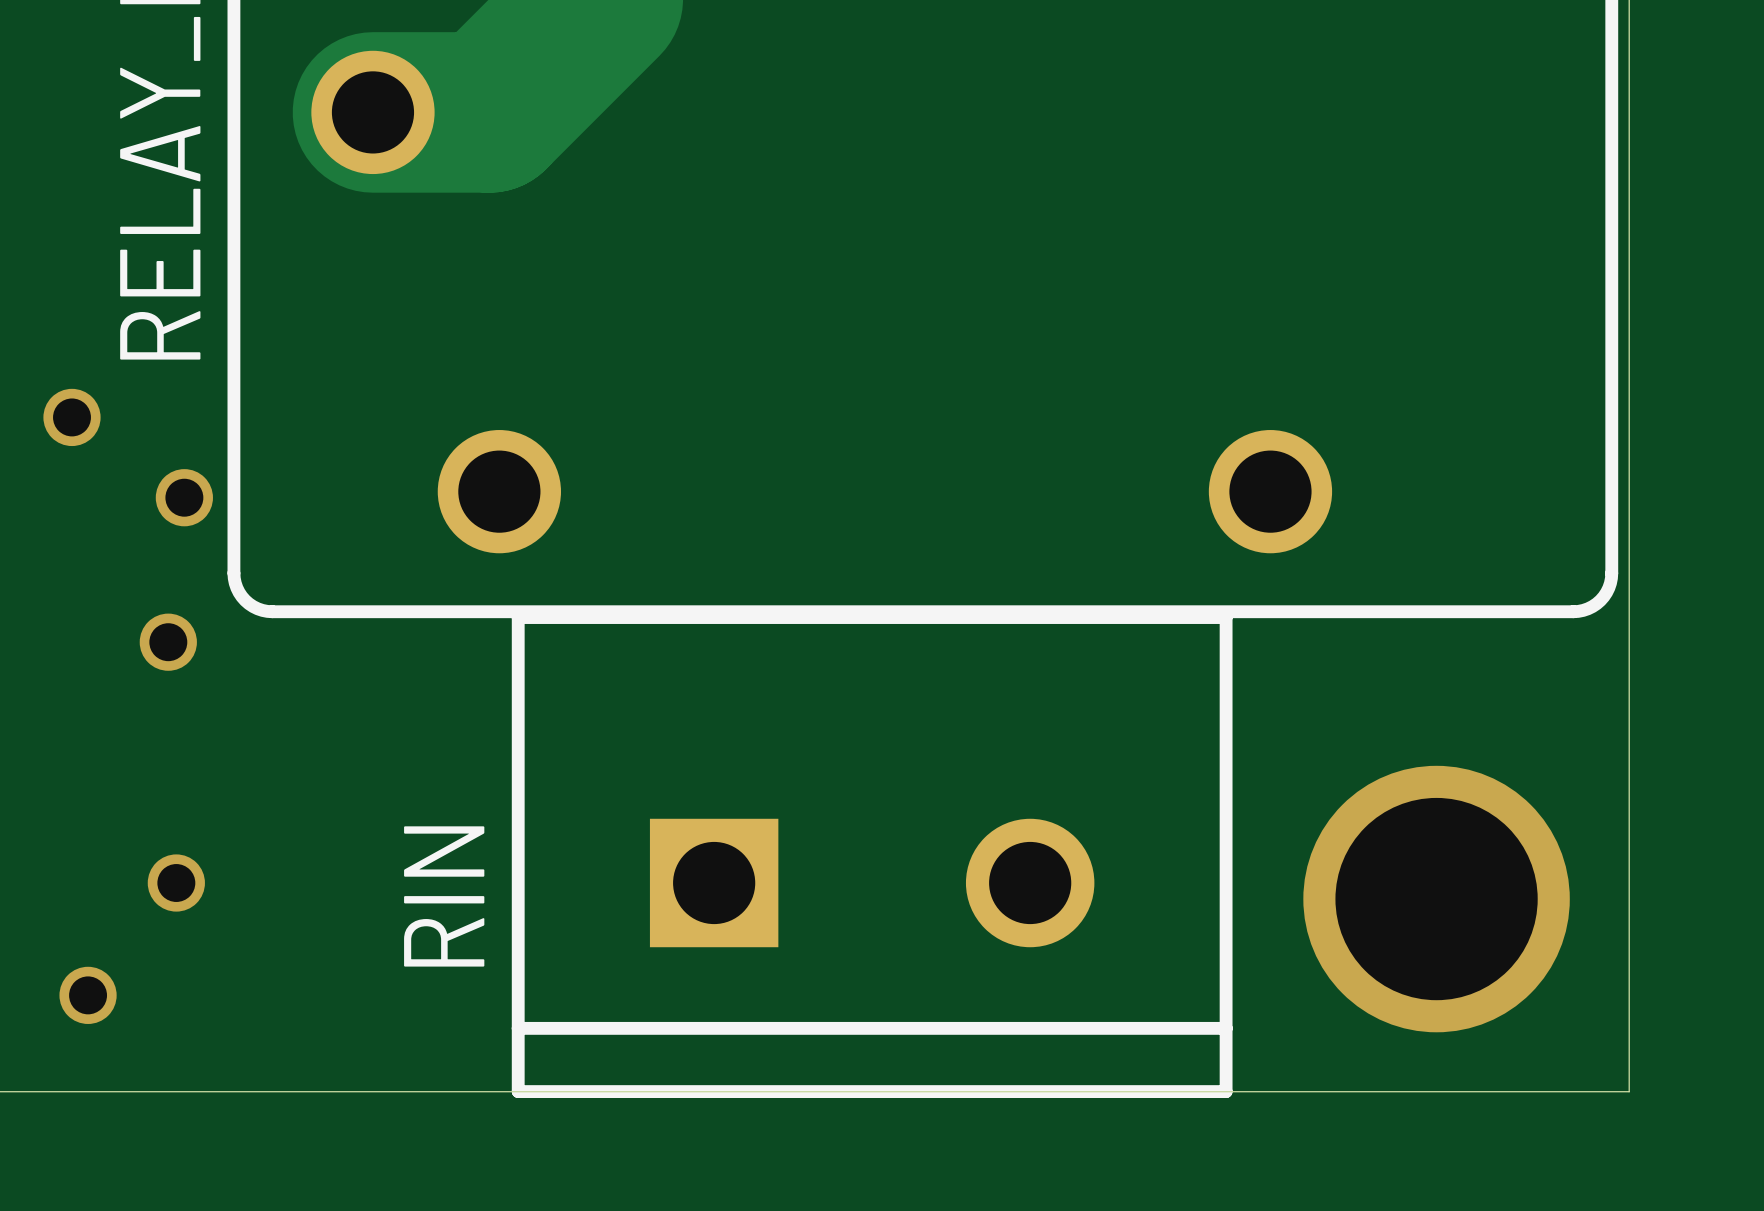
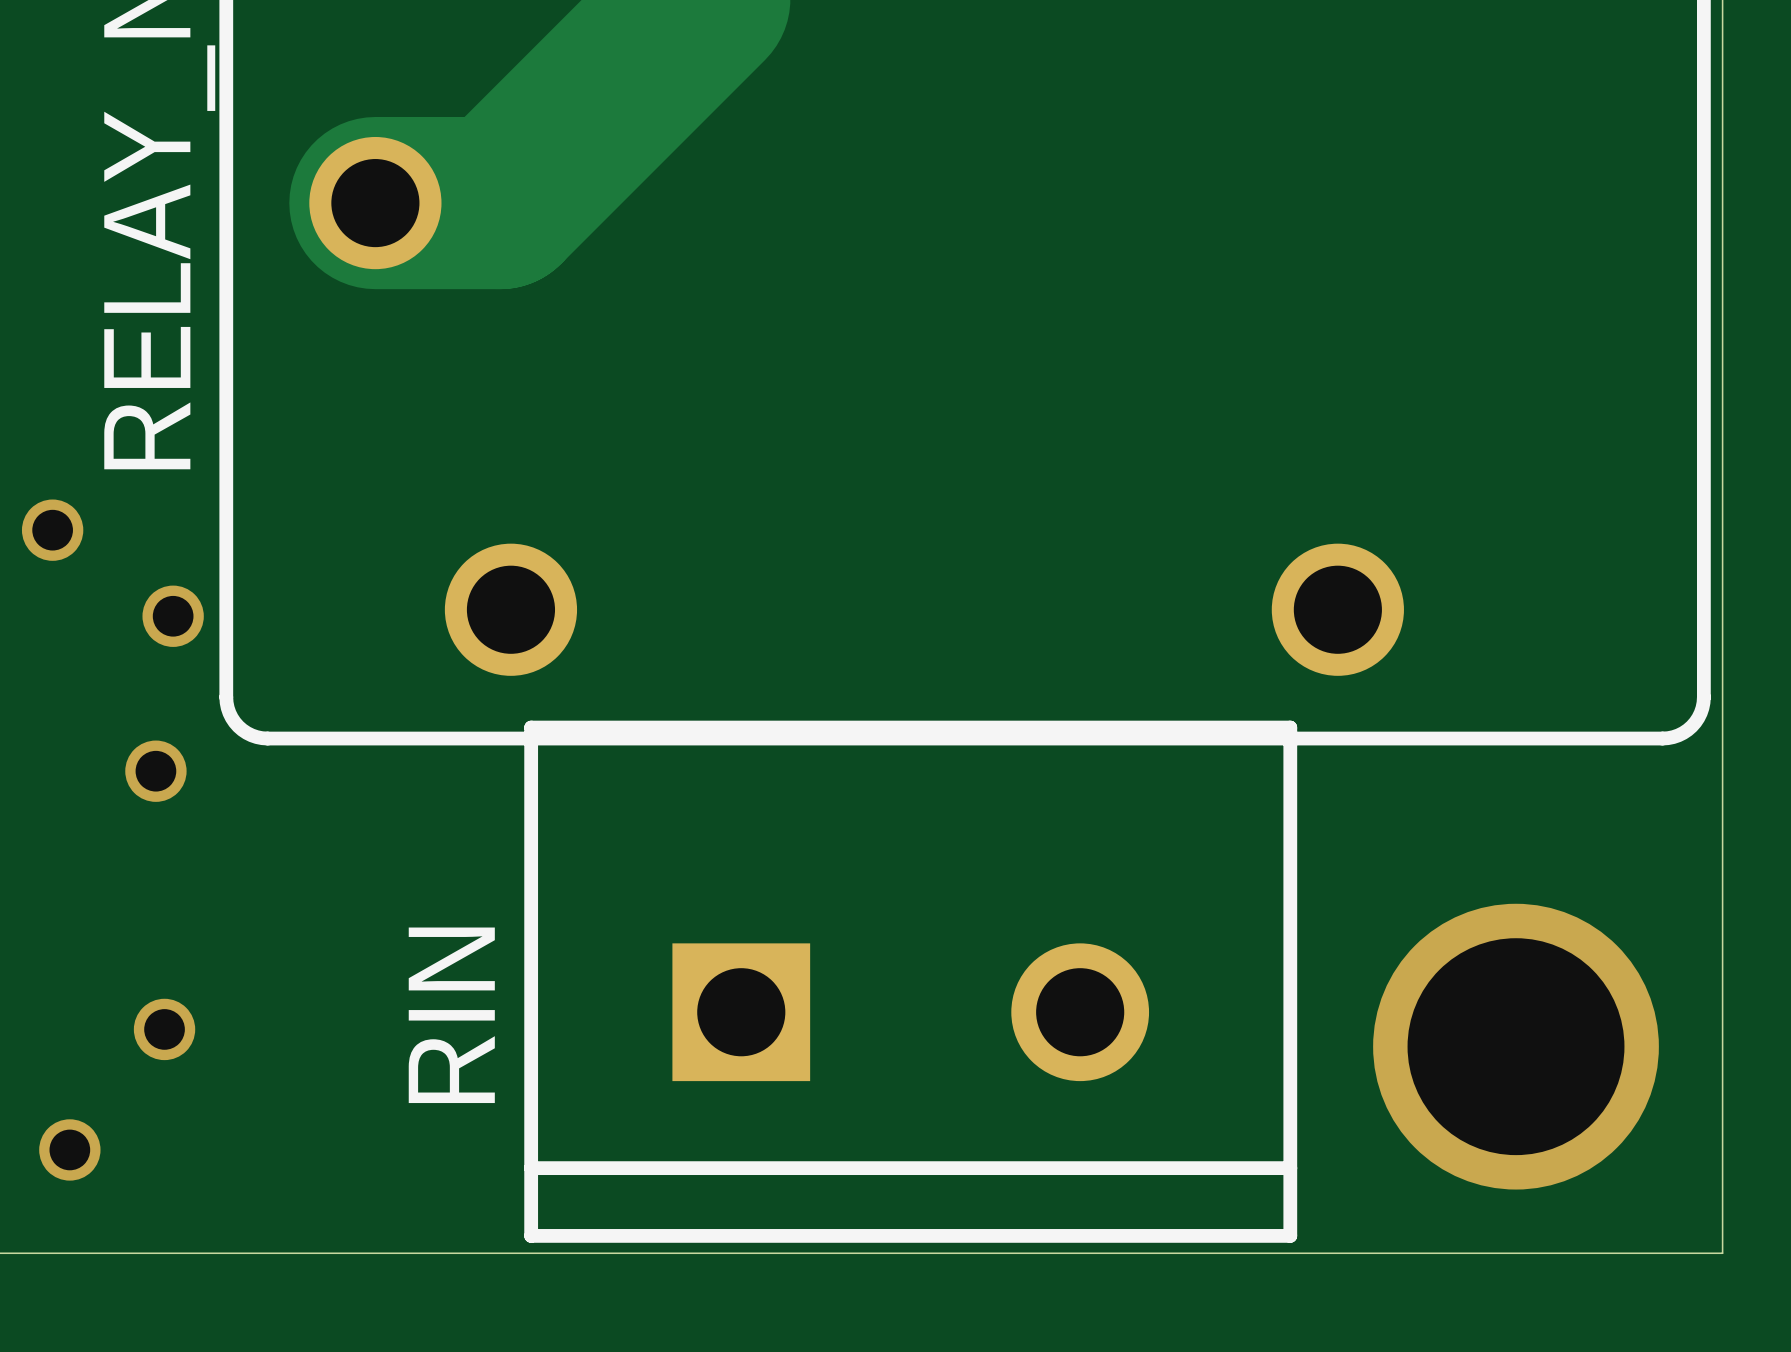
RIN position: (872, 854) -> (910, 981)

